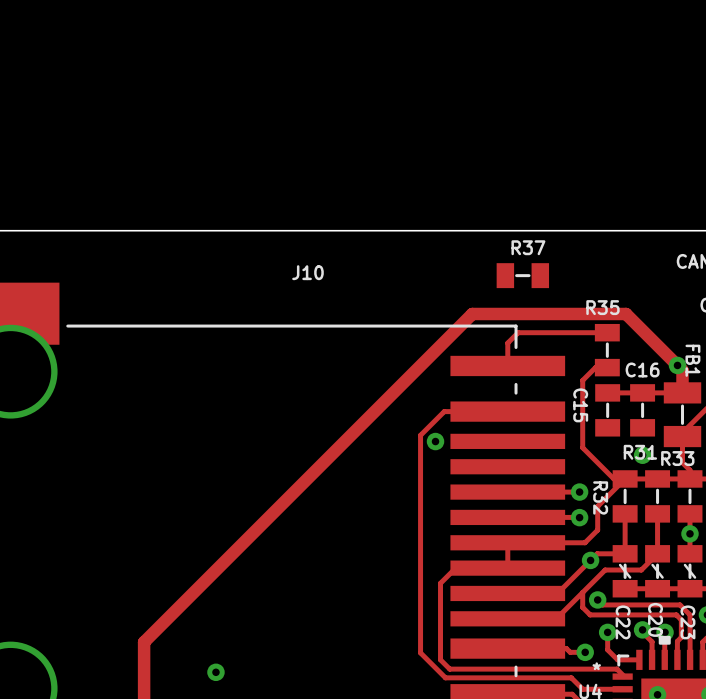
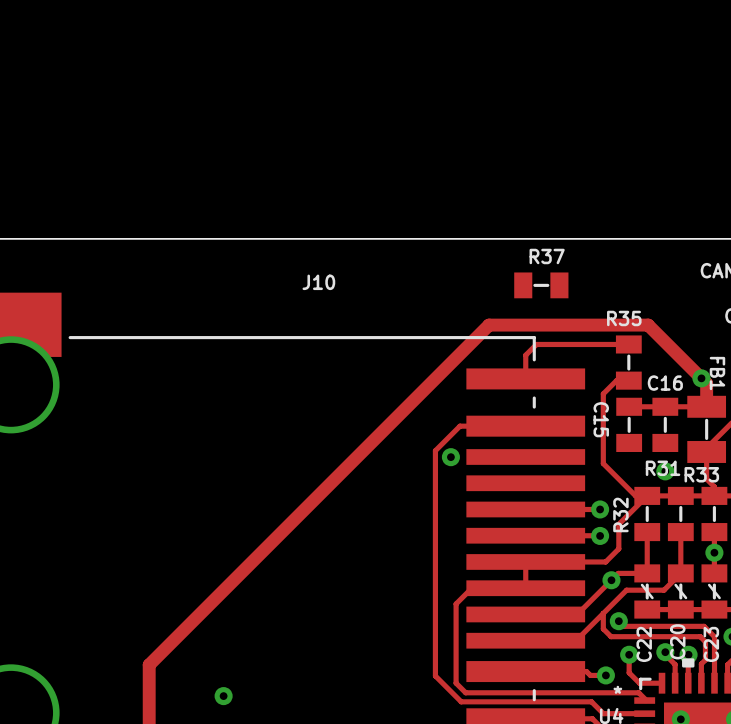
R32 name rotation: 0° (600, 497) -> 180° (620, 514)
C20 name rotation: 0° (655, 619) -> 180° (677, 641)
C22 name rotation: 0° (623, 622) -> 180° (644, 644)
C23 name rotation: 0° (687, 622) -> 180° (711, 644)

